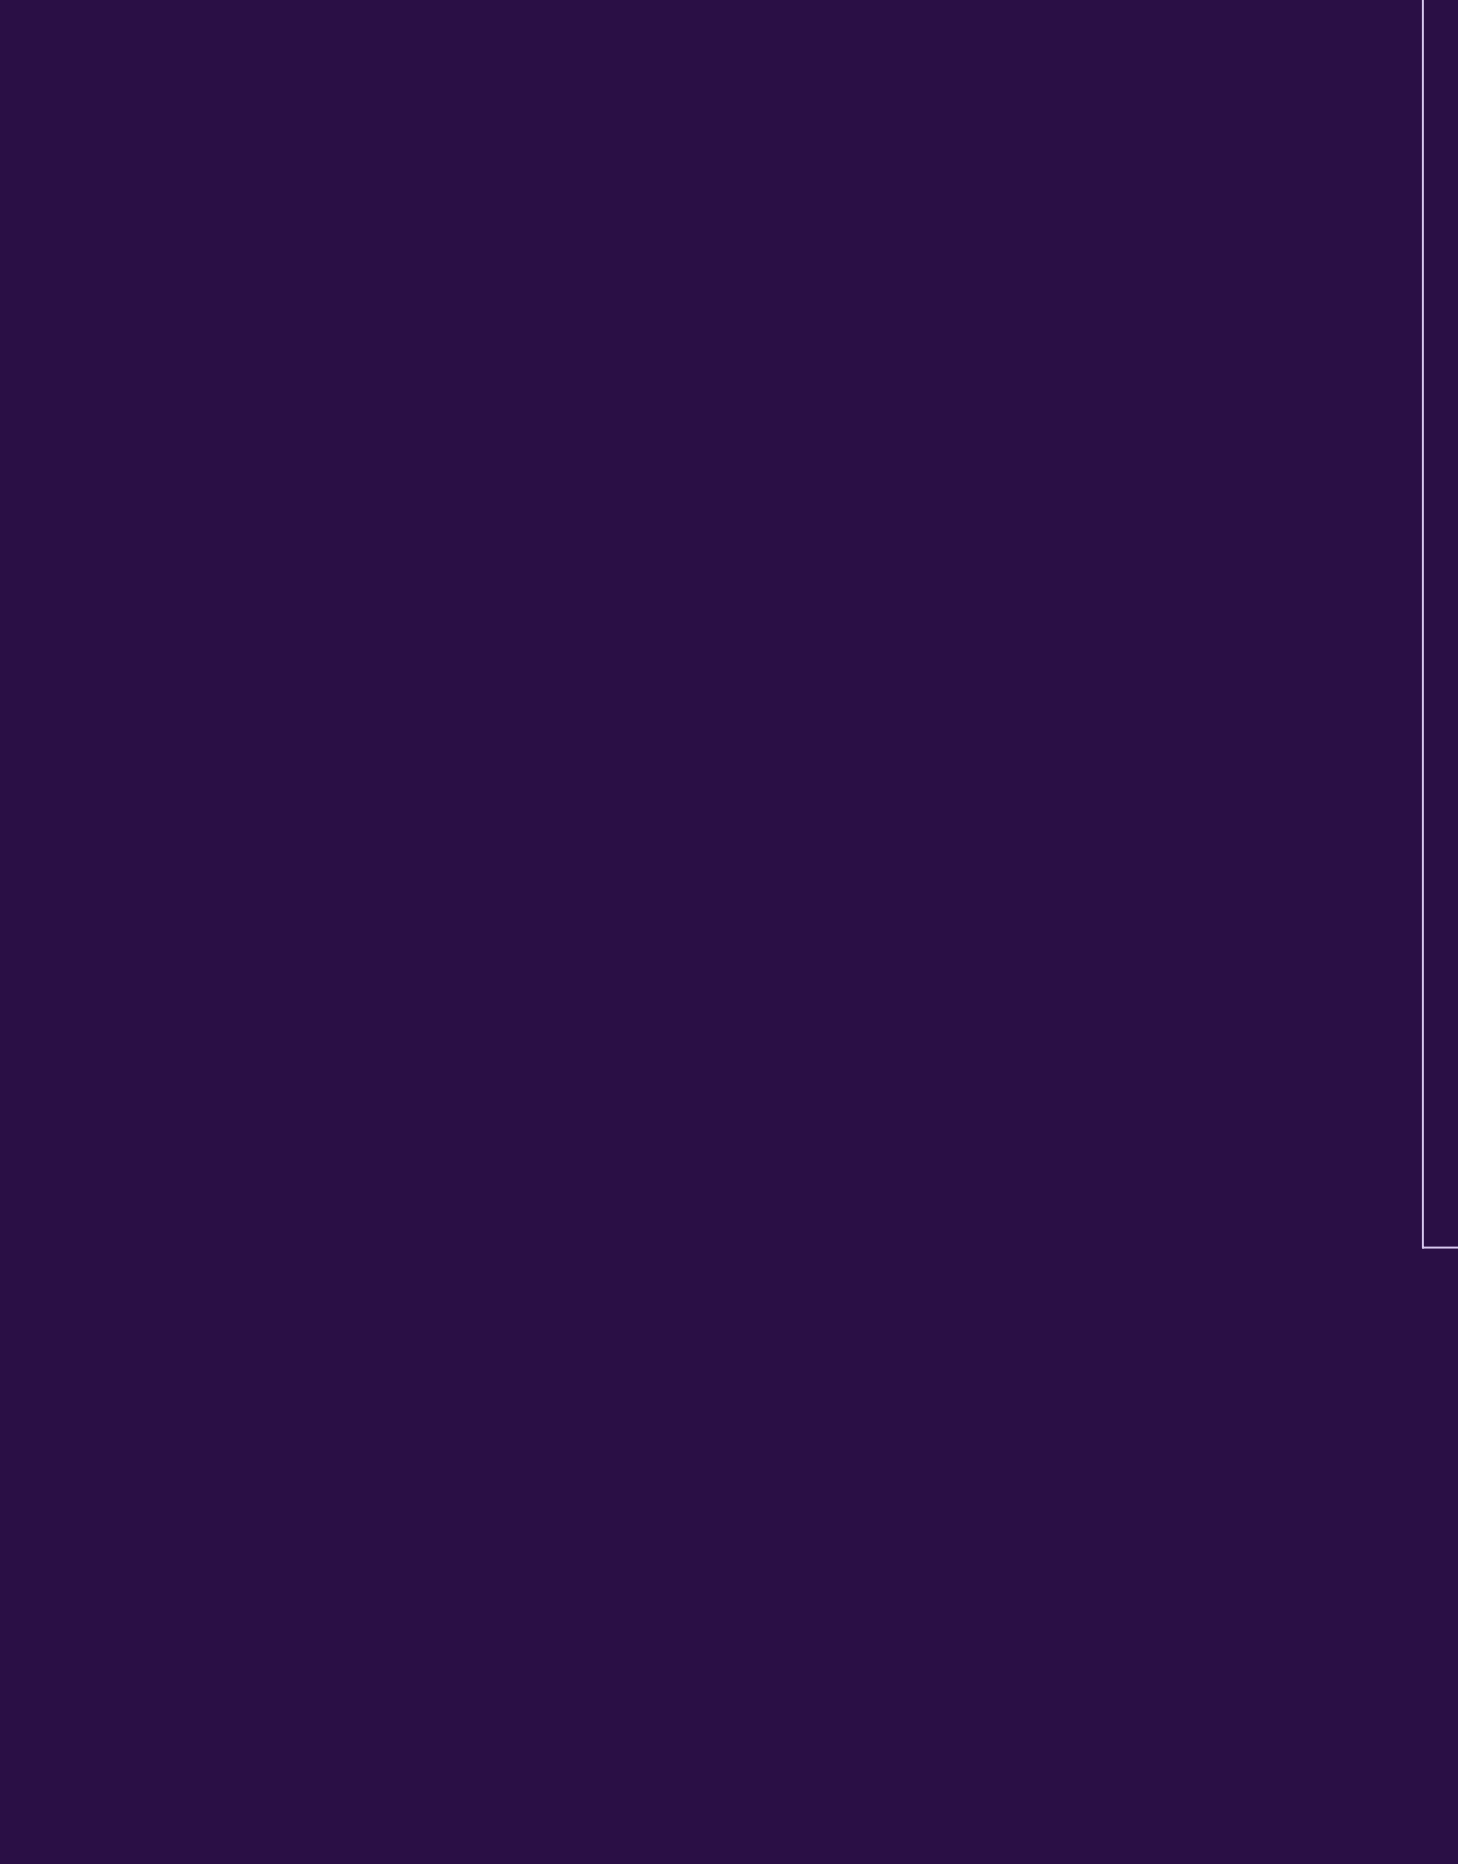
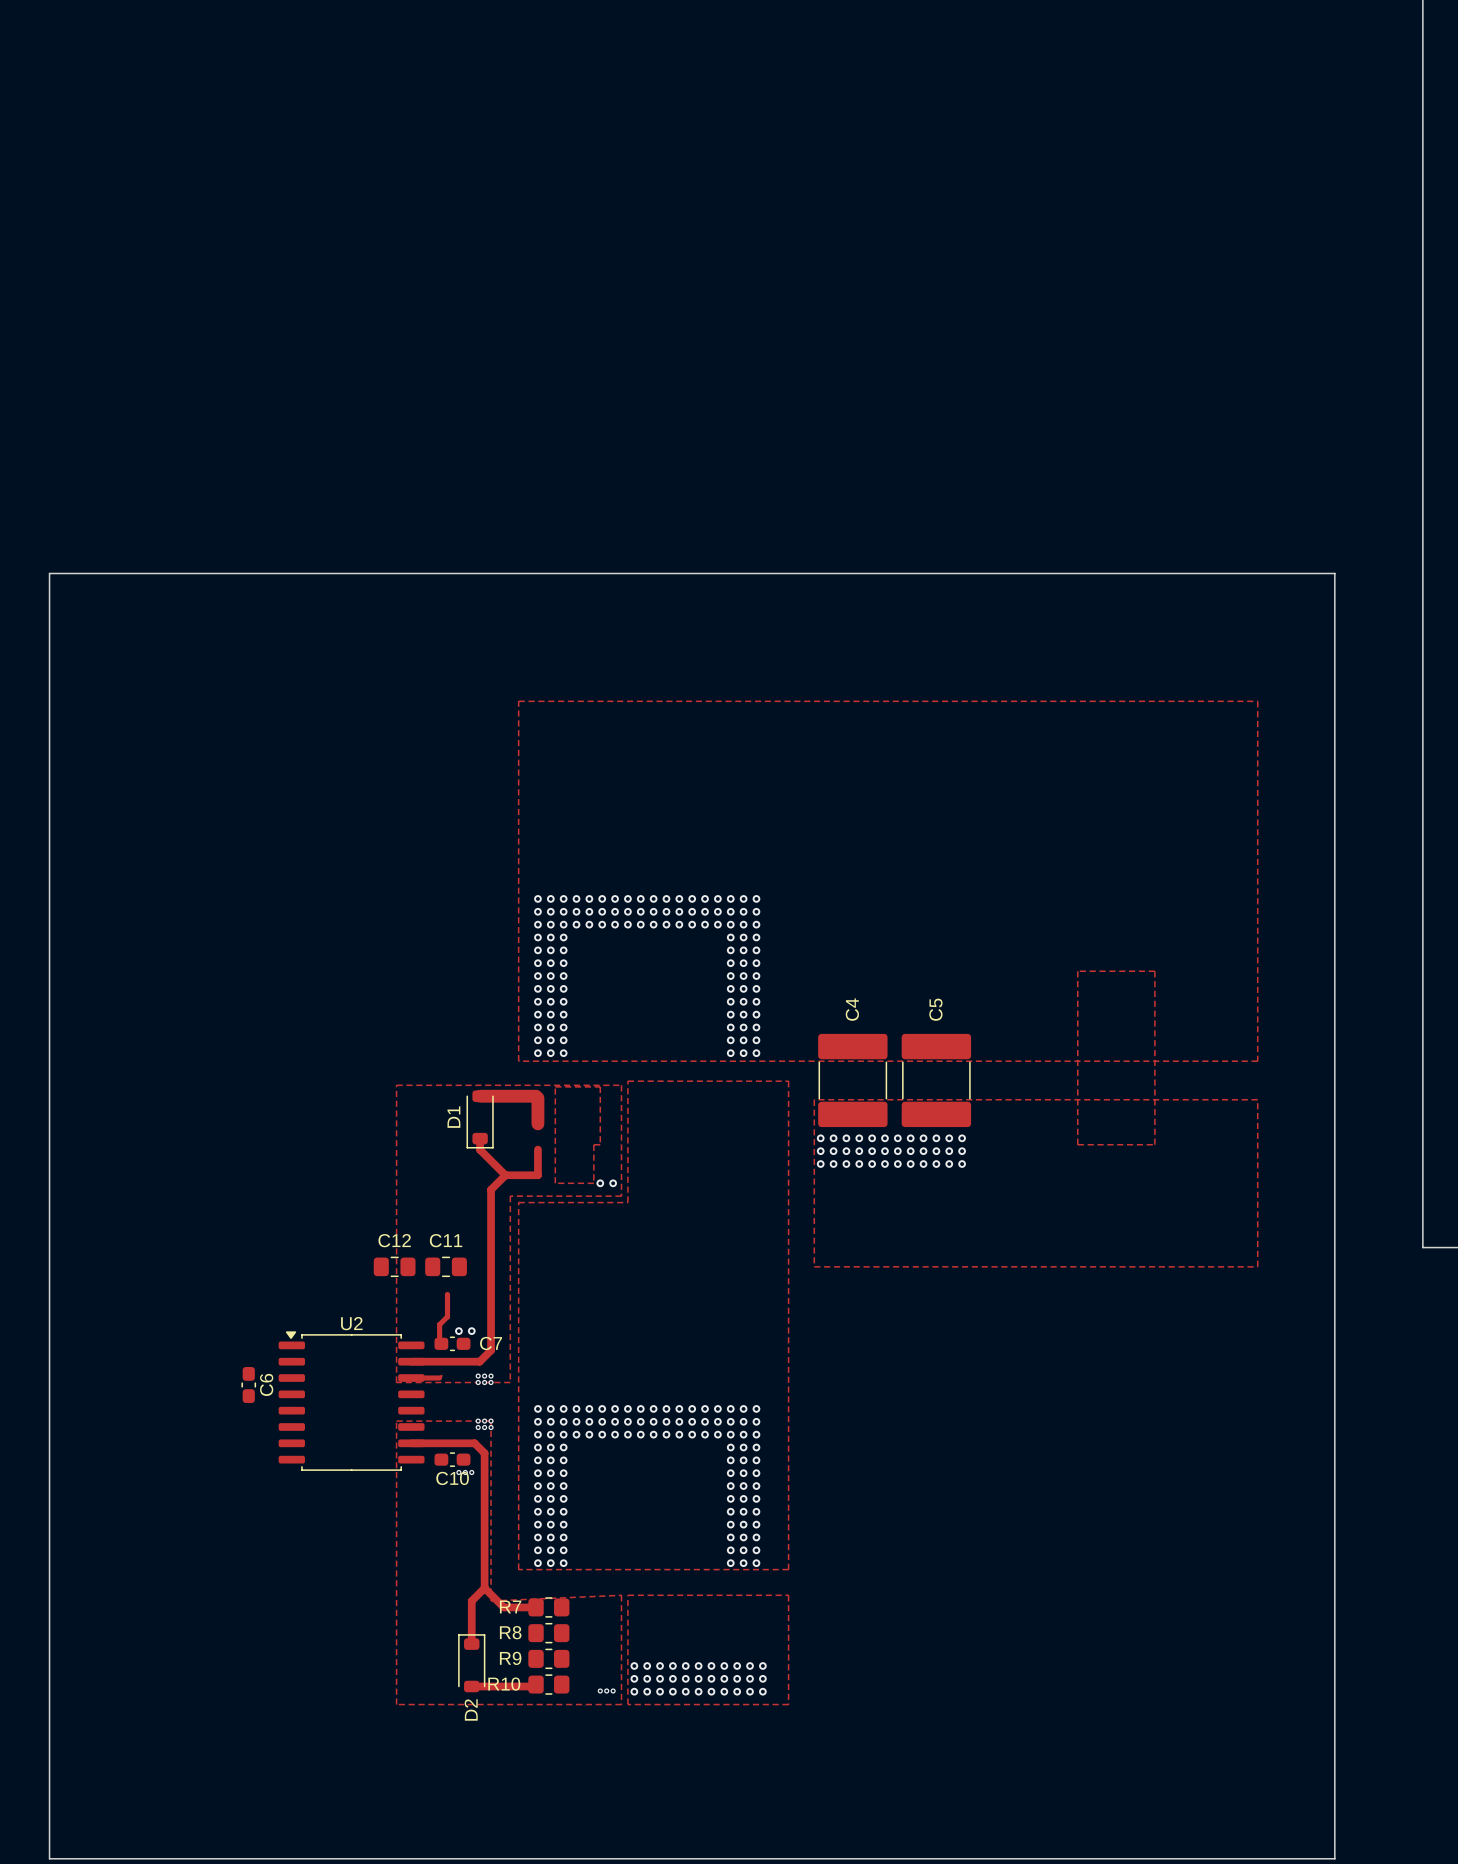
board edge: none -> (49, 573) (1334, 573) (1334, 1858) (49, 1858) (49, 573)
zone outline: none -> (518, 701) (1257, 701) (1257, 1061) (518, 1061) (518, 701)
via: none -> (537, 898)
via: none -> (550, 898)
via: none -> (563, 898)
via: none -> (576, 898)
via: none -> (589, 898)
via: none -> (602, 898)
via: none -> (615, 898)
via: none -> (627, 898)
via: none -> (640, 898)
via: none -> (653, 898)
via: none -> (666, 898)
via: none -> (679, 898)
via: none -> (692, 898)
via: none -> (705, 898)
via: none -> (717, 898)
via: none -> (730, 898)
via: none -> (743, 898)
via: none -> (756, 898)
via: none -> (537, 911)
via: none -> (550, 911)
via: none -> (563, 911)
via: none -> (576, 911)
via: none -> (589, 911)
via: none -> (602, 911)
via: none -> (615, 911)
via: none -> (627, 911)
via: none -> (640, 911)
via: none -> (653, 911)
via: none -> (666, 911)
via: none -> (679, 911)
via: none -> (692, 911)
via: none -> (705, 911)
via: none -> (717, 911)
via: none -> (730, 911)
via: none -> (743, 911)
via: none -> (756, 911)
via: none -> (537, 924)
via: none -> (550, 924)
via: none -> (563, 924)
via: none -> (576, 924)
via: none -> (589, 924)
via: none -> (602, 924)
via: none -> (615, 924)
via: none -> (627, 924)
via: none -> (640, 924)
via: none -> (653, 924)
via: none -> (666, 924)
via: none -> (679, 924)
via: none -> (692, 924)
via: none -> (705, 924)
via: none -> (717, 924)
via: none -> (730, 924)
via: none -> (743, 924)
via: none -> (756, 924)
via: none -> (537, 937)
via: none -> (550, 937)
via: none -> (563, 937)
via: none -> (730, 937)
via: none -> (743, 937)
via: none -> (756, 937)
via: none -> (537, 950)
via: none -> (550, 950)
via: none -> (563, 950)
via: none -> (730, 950)
via: none -> (743, 950)
via: none -> (756, 950)
via: none -> (537, 963)
via: none -> (550, 963)
via: none -> (563, 963)
via: none -> (730, 963)
via: none -> (743, 963)
via: none -> (756, 963)
zone outline: none -> (1077, 971) (1077, 1144) (1154, 1144) (1154, 971) (1077, 971)
via: none -> (537, 976)
via: none -> (550, 976)
via: none -> (563, 976)
via: none -> (730, 976)
via: none -> (743, 976)
via: none -> (756, 976)
via: none -> (537, 988)
via: none -> (550, 988)
via: none -> (563, 988)
via: none -> (730, 988)
via: none -> (743, 988)
via: none -> (756, 988)
via: none -> (537, 1001)
via: none -> (550, 1001)
via: none -> (563, 1001)
via: none -> (730, 1001)
via: none -> (743, 1001)
via: none -> (756, 1001)
via: none -> (537, 1014)
via: none -> (550, 1014)
via: none -> (563, 1014)
via: none -> (730, 1014)
via: none -> (743, 1014)
via: none -> (756, 1014)
via: none -> (537, 1027)
via: none -> (550, 1027)
via: none -> (563, 1027)
via: none -> (730, 1027)
via: none -> (743, 1027)
via: none -> (756, 1027)
via: none -> (537, 1040)
via: none -> (550, 1040)
via: none -> (563, 1040)
via: none -> (730, 1040)
via: none -> (743, 1040)
via: none -> (756, 1040)
via: none -> (537, 1053)
via: none -> (550, 1053)
via: none -> (563, 1053)
via: none -> (730, 1053)
via: none -> (743, 1053)
via: none -> (756, 1053)
C4: none -> (852, 1080)
C5: none -> (936, 1080)
zone outline: none -> (627, 1081) (627, 1202) (518, 1202) (518, 1569) (788, 1569) (788, 1081) (627, 1081)
zone outline: none -> (396, 1085) (396, 1382) (510, 1382) (510, 1196) (621, 1196) (621, 1085) (396, 1085)
zone outline: none -> (555, 1086) (600, 1086) (600, 1144) (593, 1144) (593, 1183) (555, 1183) (555, 1086)
track: none -> (480, 1096) (536, 1096) (537, 1098) (537, 1123)
zone outline: none -> (814, 1099) (1257, 1099) (1257, 1266) (814, 1266) (814, 1099)
D1: none -> (480, 1119)
track: none -> (480, 1138) (480, 1149) (505, 1175)
via: none -> (820, 1138)
via: none -> (833, 1138)
via: none -> (846, 1138)
via: none -> (859, 1138)
via: none -> (872, 1138)
via: none -> (884, 1138)
via: none -> (897, 1138)
via: none -> (910, 1138)
via: none -> (923, 1138)
via: none -> (936, 1138)
via: none -> (949, 1138)
via: none -> (962, 1138)
track: none -> (537, 1149) (537, 1175) (505, 1175)
via: none -> (820, 1151)
via: none -> (833, 1151)
via: none -> (846, 1151)
via: none -> (859, 1151)
via: none -> (872, 1151)
via: none -> (884, 1151)
via: none -> (897, 1151)
via: none -> (910, 1151)
via: none -> (923, 1151)
via: none -> (936, 1151)
via: none -> (949, 1151)
via: none -> (962, 1151)
via: none -> (820, 1164)
via: none -> (833, 1164)
via: none -> (846, 1164)
via: none -> (859, 1164)
via: none -> (872, 1164)
via: none -> (884, 1164)
via: none -> (897, 1164)
via: none -> (910, 1164)
via: none -> (923, 1164)
via: none -> (936, 1164)
via: none -> (949, 1164)
via: none -> (962, 1164)
track: none -> (505, 1175) (491, 1189) (491, 1350) (479, 1361) (411, 1361)
via: none -> (600, 1183)
via: none -> (613, 1183)
C12: none -> (394, 1266)
C11: none -> (446, 1266)
track: none -> (447, 1294) (447, 1316) (439, 1324) (439, 1345) (441, 1343)
via: none -> (458, 1331)
via: none -> (471, 1331)
C7: none -> (452, 1343)
track: none -> (441, 1376) (439, 1378) (411, 1378)
via: none -> (478, 1376)
via: none -> (484, 1376)
via: none -> (491, 1376)
via: none -> (478, 1382)
via: none -> (484, 1382)
via: none -> (491, 1382)
C6: none -> (248, 1384)
U2: none -> (351, 1401)
via: none -> (537, 1408)
via: none -> (550, 1408)
via: none -> (563, 1408)
via: none -> (576, 1408)
via: none -> (589, 1408)
via: none -> (602, 1408)
via: none -> (615, 1408)
via: none -> (627, 1408)
via: none -> (640, 1408)
via: none -> (653, 1408)
via: none -> (666, 1408)
via: none -> (679, 1408)
via: none -> (692, 1408)
via: none -> (705, 1408)
via: none -> (717, 1408)
via: none -> (730, 1408)
via: none -> (743, 1408)
via: none -> (756, 1408)
zone outline: none -> (396, 1421) (396, 1704) (621, 1704) (621, 1595) (491, 1601) (491, 1421) (396, 1421)
via: none -> (478, 1421)
via: none -> (484, 1421)
via: none -> (491, 1421)
via: none -> (537, 1421)
via: none -> (550, 1421)
via: none -> (563, 1421)
via: none -> (576, 1421)
via: none -> (589, 1421)
via: none -> (602, 1421)
via: none -> (615, 1421)
via: none -> (627, 1421)
via: none -> (640, 1421)
via: none -> (653, 1421)
via: none -> (666, 1421)
via: none -> (679, 1421)
via: none -> (692, 1421)
via: none -> (705, 1421)
via: none -> (717, 1421)
via: none -> (730, 1421)
via: none -> (743, 1421)
via: none -> (756, 1421)
via: none -> (478, 1427)
via: none -> (484, 1427)
via: none -> (491, 1427)
via: none -> (537, 1434)
via: none -> (550, 1434)
via: none -> (563, 1434)
via: none -> (576, 1434)
via: none -> (589, 1434)
via: none -> (602, 1434)
via: none -> (615, 1434)
via: none -> (627, 1434)
via: none -> (640, 1434)
via: none -> (653, 1434)
via: none -> (666, 1434)
via: none -> (679, 1434)
via: none -> (692, 1434)
via: none -> (705, 1434)
via: none -> (717, 1434)
via: none -> (730, 1434)
via: none -> (743, 1434)
via: none -> (756, 1434)
track: none -> (411, 1443) (474, 1443) (484, 1453) (484, 1588)
via: none -> (537, 1447)
via: none -> (550, 1447)
via: none -> (563, 1447)
via: none -> (730, 1447)
via: none -> (743, 1447)
via: none -> (756, 1447)
C10: none -> (452, 1459)
via: none -> (537, 1460)
via: none -> (550, 1460)
via: none -> (563, 1460)
via: none -> (730, 1460)
via: none -> (743, 1460)
via: none -> (756, 1460)
via: none -> (458, 1472)
via: none -> (465, 1472)
via: none -> (471, 1472)
via: none -> (537, 1473)
via: none -> (550, 1473)
via: none -> (563, 1473)
via: none -> (730, 1473)
via: none -> (743, 1473)
via: none -> (756, 1473)
via: none -> (537, 1486)
via: none -> (550, 1486)
via: none -> (563, 1486)
via: none -> (730, 1486)
via: none -> (743, 1486)
via: none -> (756, 1486)
via: none -> (537, 1498)
via: none -> (550, 1498)
via: none -> (563, 1498)
via: none -> (730, 1498)
via: none -> (743, 1498)
via: none -> (756, 1498)
via: none -> (537, 1511)
via: none -> (550, 1511)
via: none -> (563, 1511)
via: none -> (730, 1511)
via: none -> (743, 1511)
via: none -> (756, 1511)
via: none -> (537, 1524)
via: none -> (550, 1524)
via: none -> (563, 1524)
via: none -> (730, 1524)
via: none -> (743, 1524)
via: none -> (756, 1524)
via: none -> (537, 1537)
via: none -> (550, 1537)
via: none -> (563, 1537)
via: none -> (730, 1537)
via: none -> (743, 1537)
via: none -> (756, 1537)
via: none -> (537, 1550)
via: none -> (550, 1550)
via: none -> (563, 1550)
via: none -> (730, 1550)
via: none -> (743, 1550)
via: none -> (756, 1550)
via: none -> (537, 1563)
via: none -> (550, 1563)
via: none -> (563, 1563)
via: none -> (730, 1563)
via: none -> (743, 1563)
via: none -> (756, 1563)
track: none -> (484, 1588) (471, 1601) (471, 1644)
track: none -> (484, 1588) (503, 1607) (536, 1607)
zone outline: none -> (627, 1595) (788, 1595) (788, 1704) (627, 1704) (627, 1595)
R7: none -> (548, 1607)
R8: none -> (548, 1633)
R9: none -> (548, 1658)
D2: none -> (471, 1663)
via: none -> (634, 1665)
via: none -> (647, 1665)
via: none -> (660, 1665)
via: none -> (672, 1665)
via: none -> (685, 1665)
via: none -> (698, 1665)
via: none -> (711, 1665)
via: none -> (724, 1665)
via: none -> (737, 1665)
via: none -> (750, 1665)
via: none -> (762, 1665)
via: none -> (634, 1678)
via: none -> (647, 1678)
via: none -> (660, 1678)
via: none -> (672, 1678)
via: none -> (685, 1678)
via: none -> (698, 1678)
via: none -> (711, 1678)
via: none -> (724, 1678)
via: none -> (737, 1678)
via: none -> (750, 1678)
via: none -> (762, 1678)
track: none -> (536, 1684) (534, 1686) (471, 1686)
R10: none -> (548, 1684)
via: none -> (600, 1690)
via: none -> (606, 1690)
via: none -> (613, 1690)
via: none -> (634, 1691)
via: none -> (647, 1691)
via: none -> (660, 1691)
via: none -> (672, 1691)
via: none -> (685, 1691)
via: none -> (698, 1691)
via: none -> (711, 1691)
via: none -> (724, 1691)
via: none -> (737, 1691)
via: none -> (750, 1691)
via: none -> (762, 1691)

